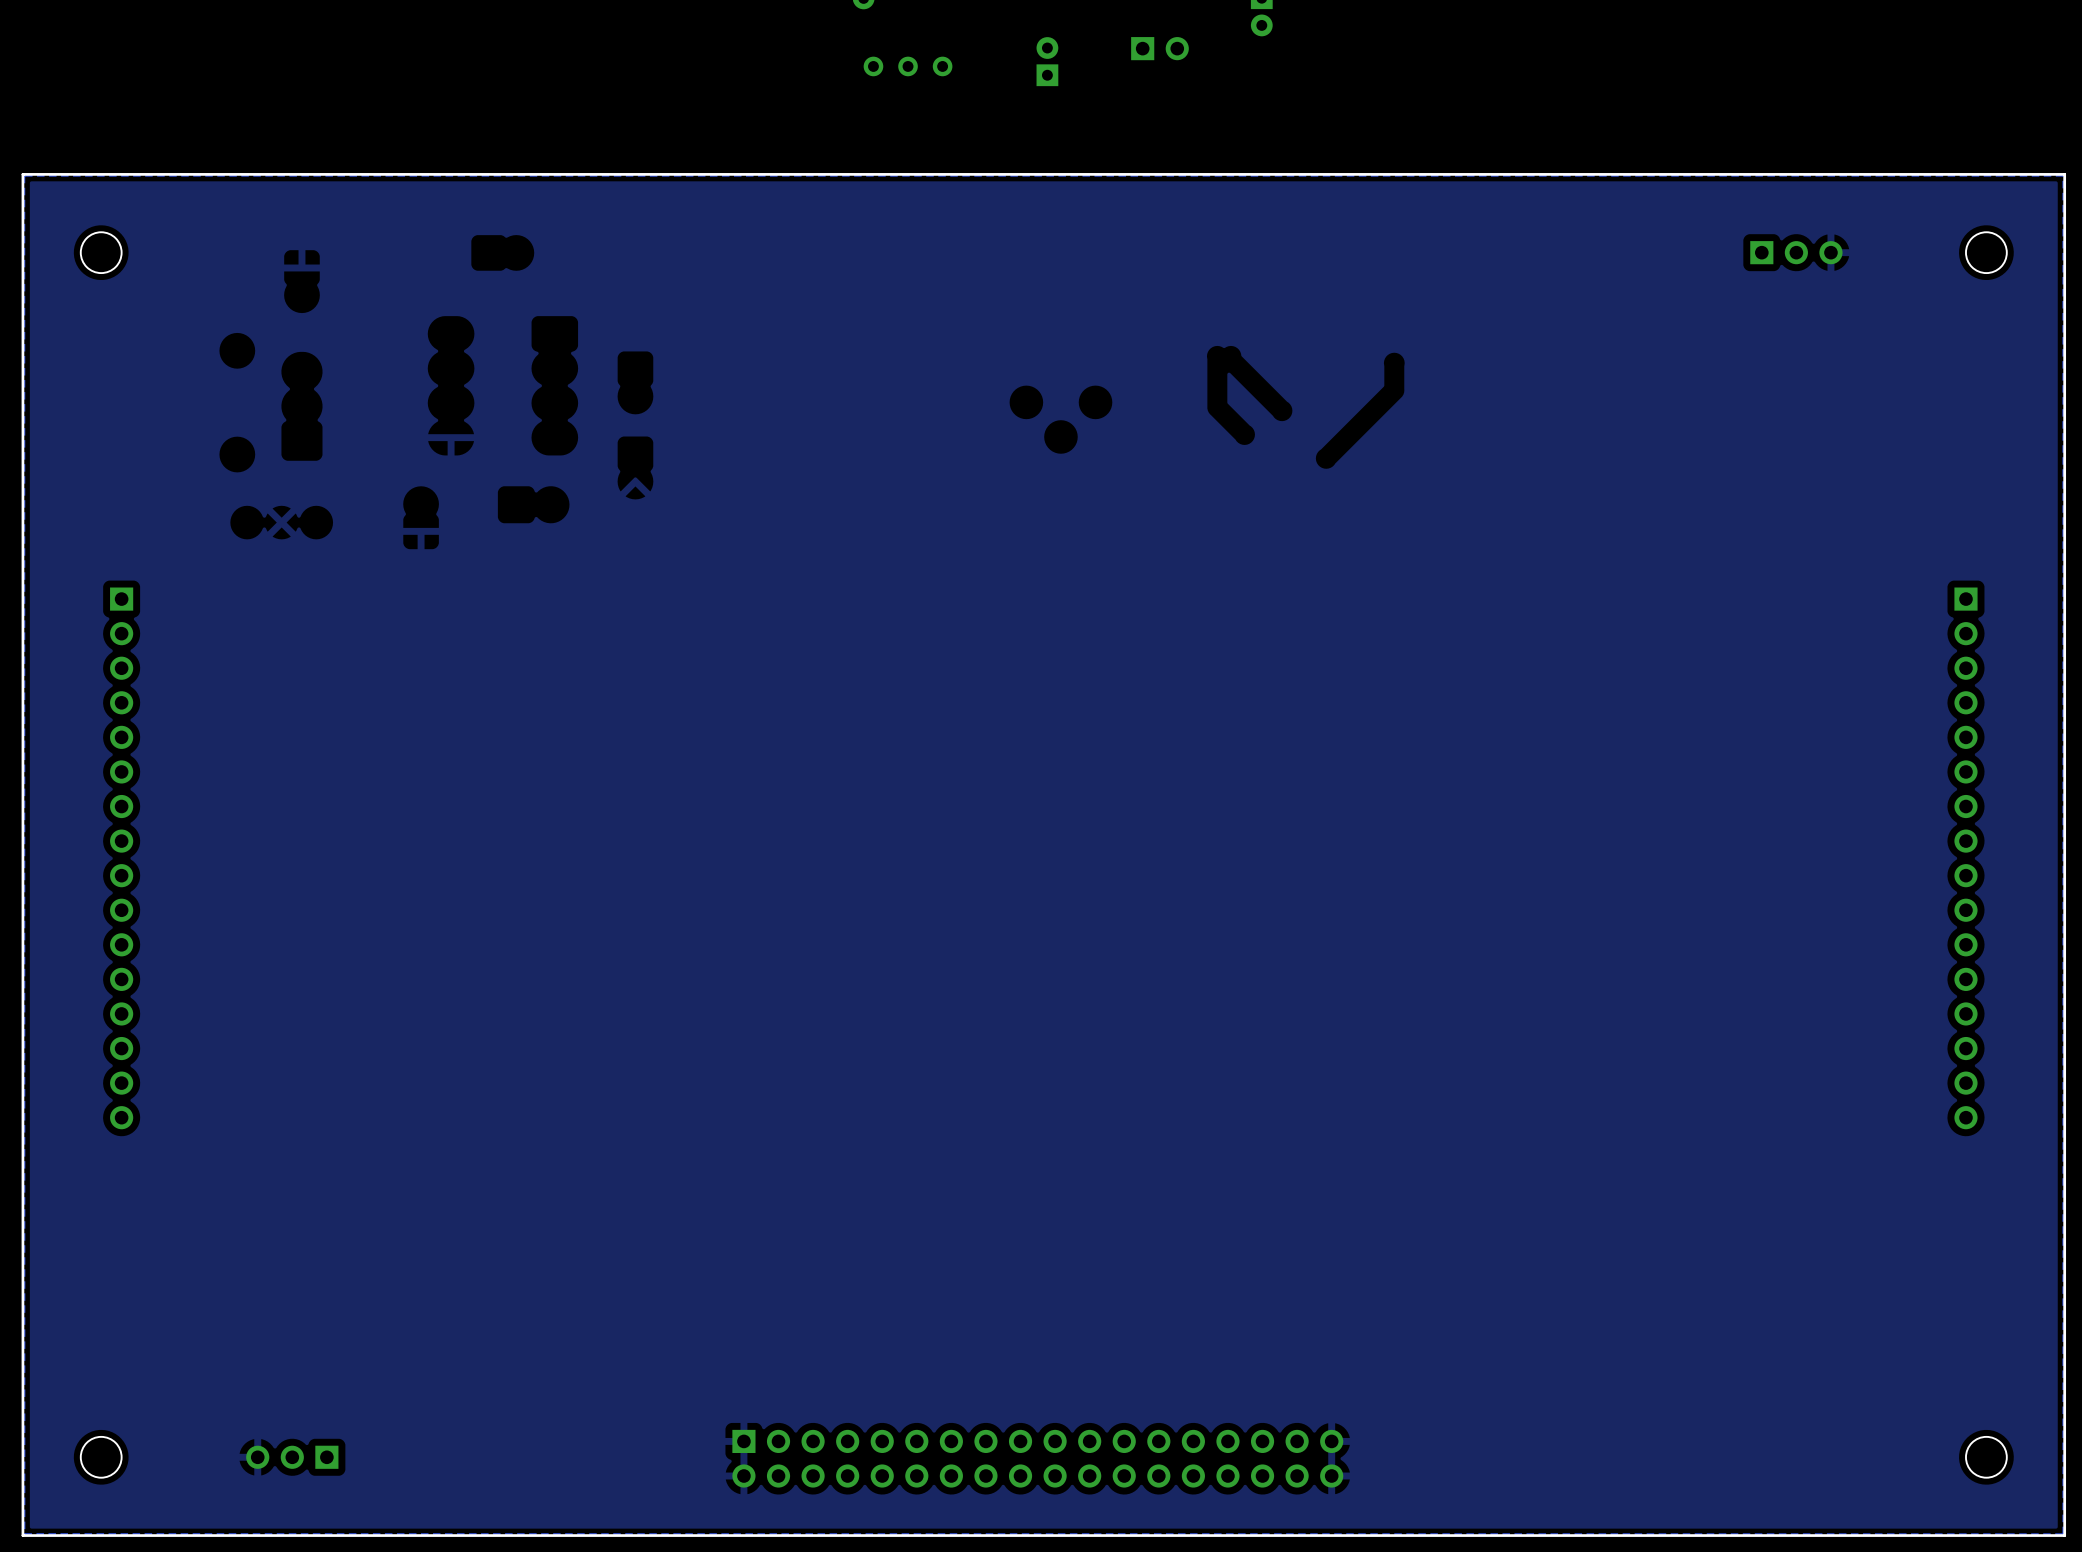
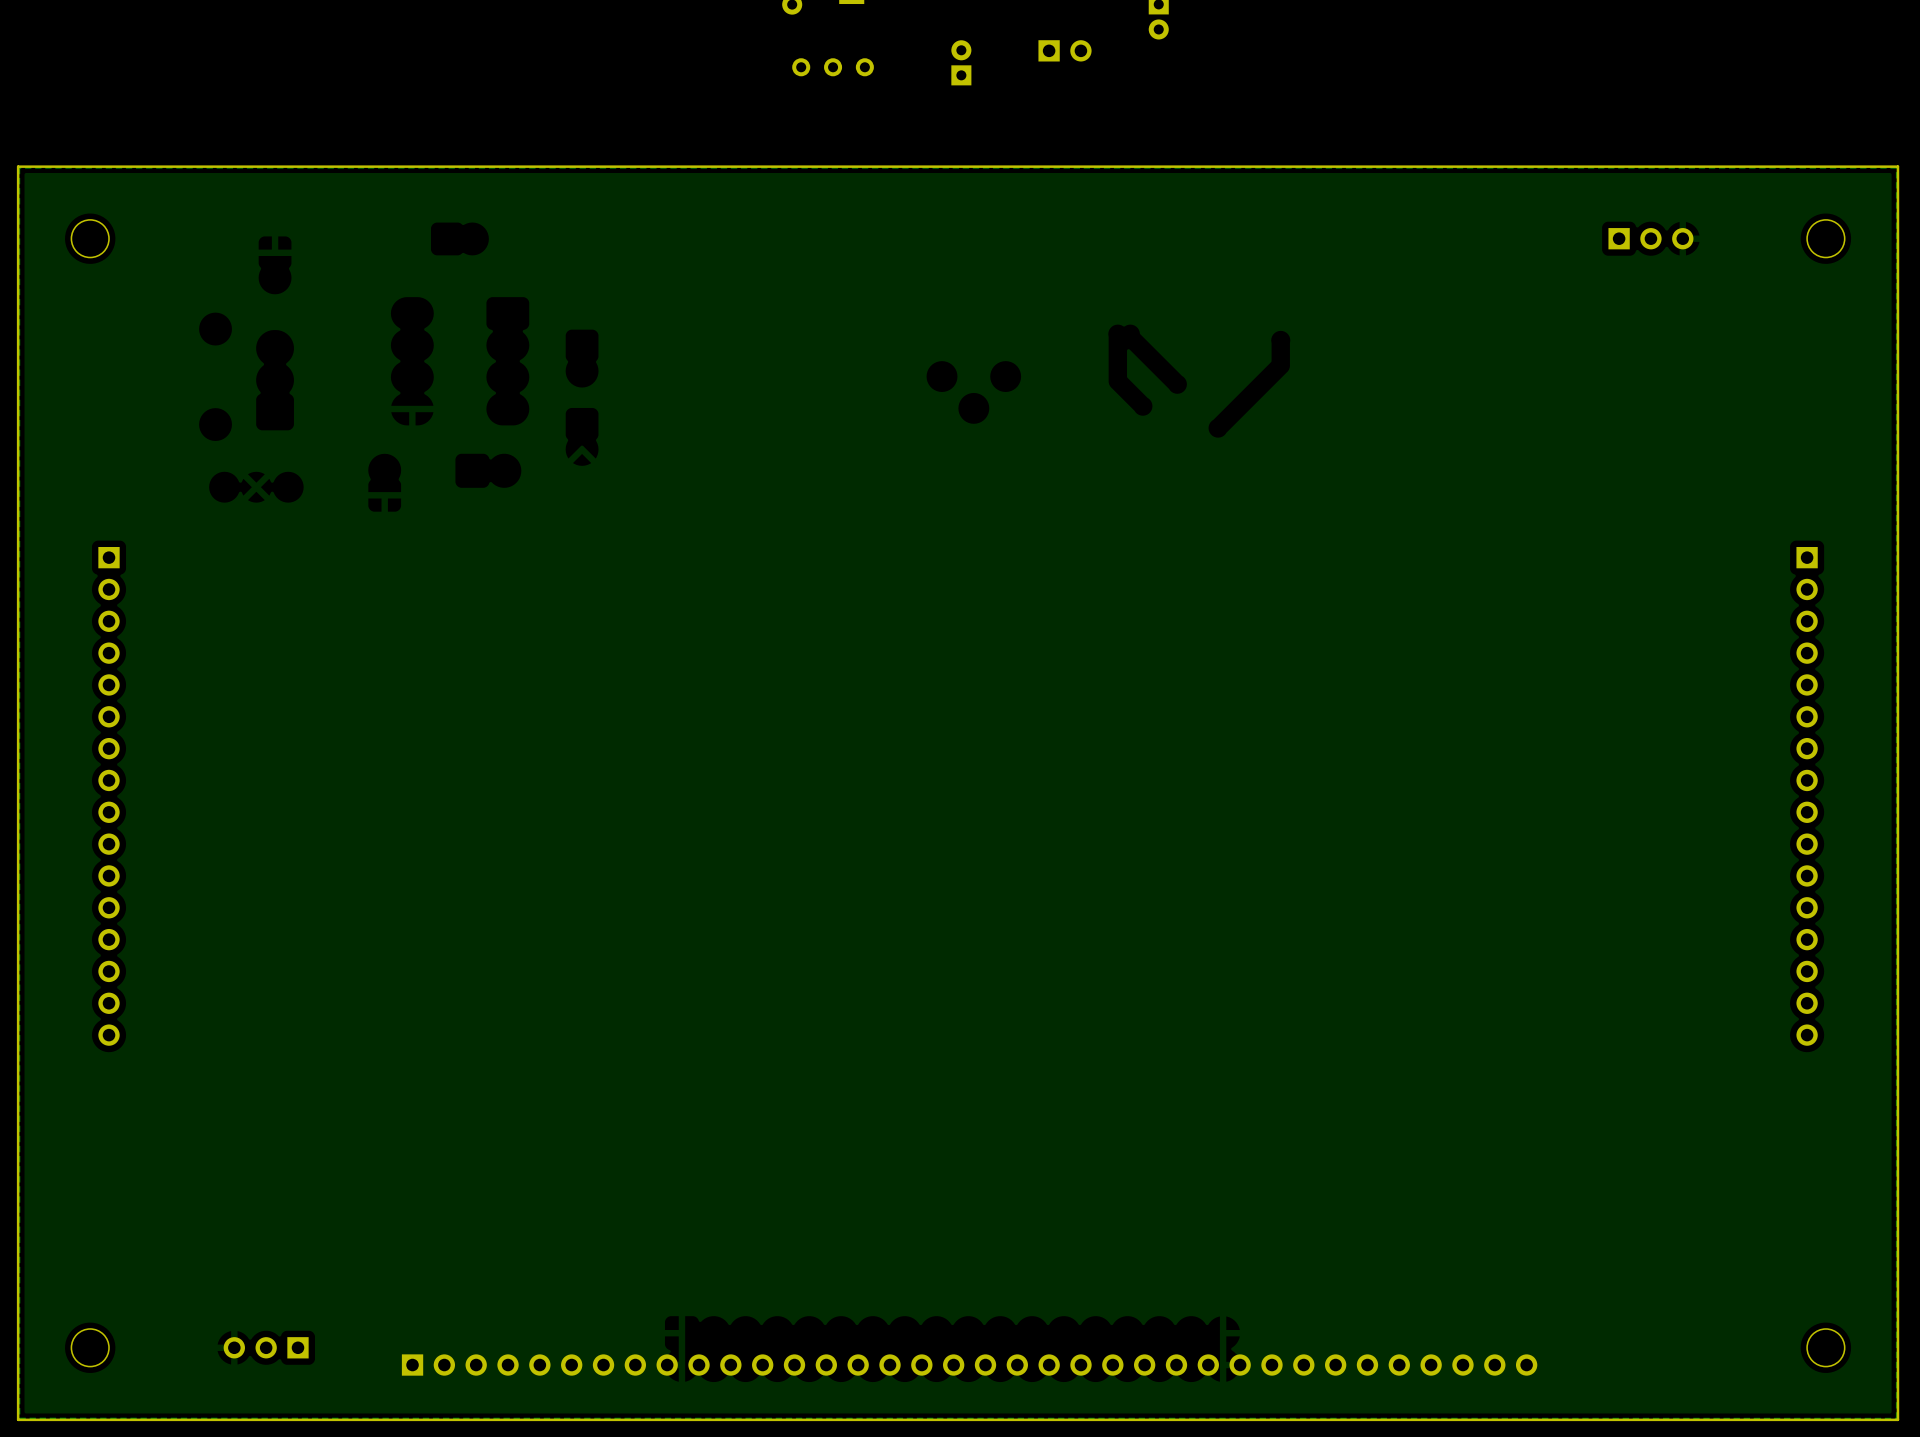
part: (1037, 1458) -> none
part: none -> (969, 1365)

